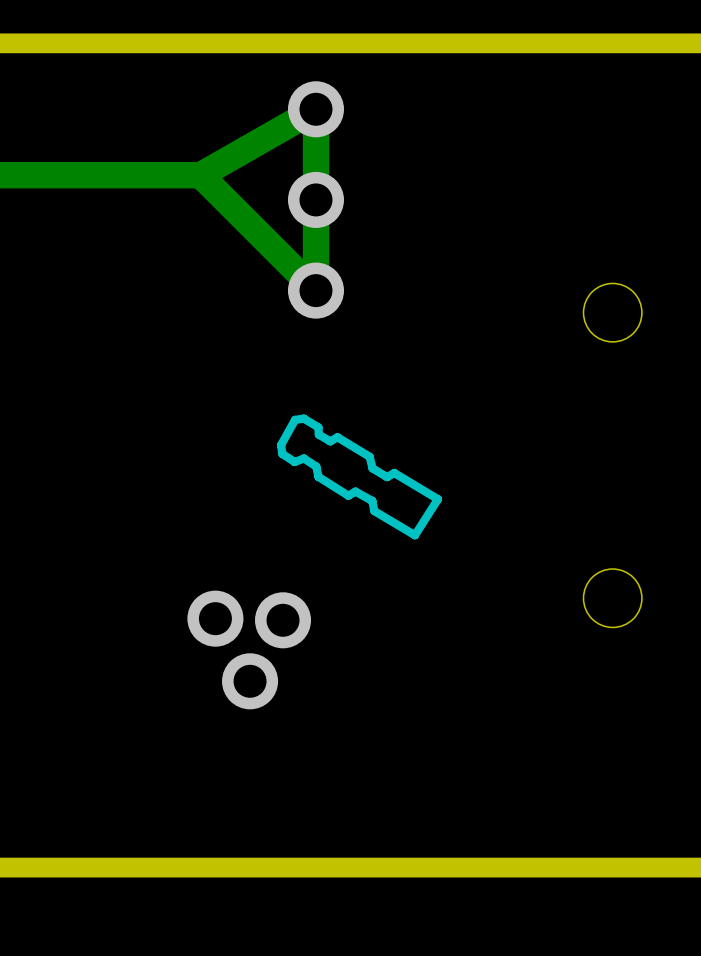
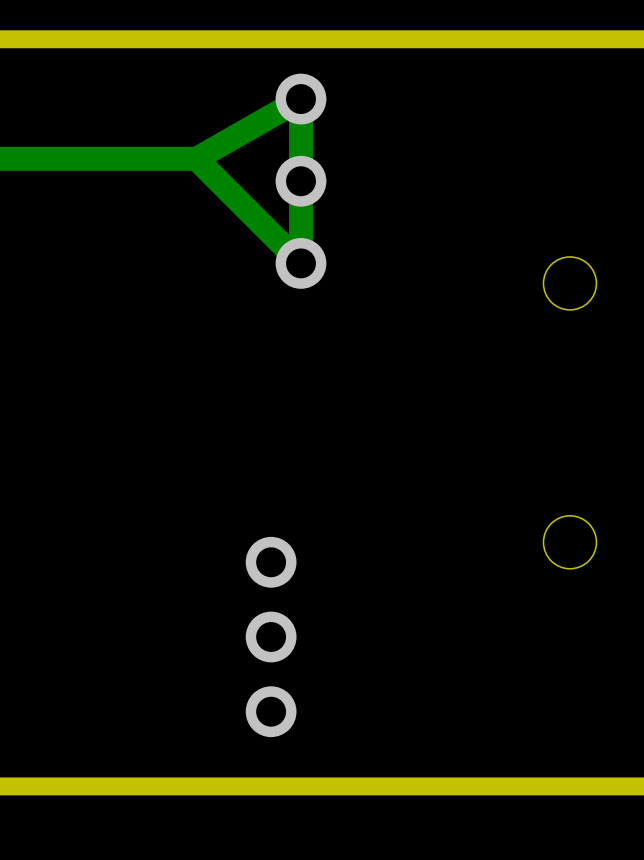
line: (303, 418) (295, 419) (281, 445) (282, 453) (294, 462) (304, 458) (316, 466) (318, 476) (348, 495) (355, 491) (372, 500) (374, 511) (414, 535) (437, 499) (394, 473) (387, 477) (372, 468) (369, 456) (337, 437) (330, 441) (318, 434) (318, 427) (303, 418) -> none
via: (215, 618) -> none
via position: (250, 681) -> (271, 636)
via: none -> (271, 711)

